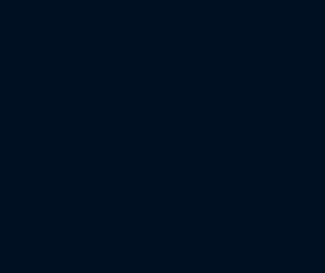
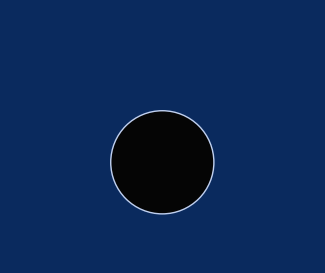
part: none -> (162, 162)

